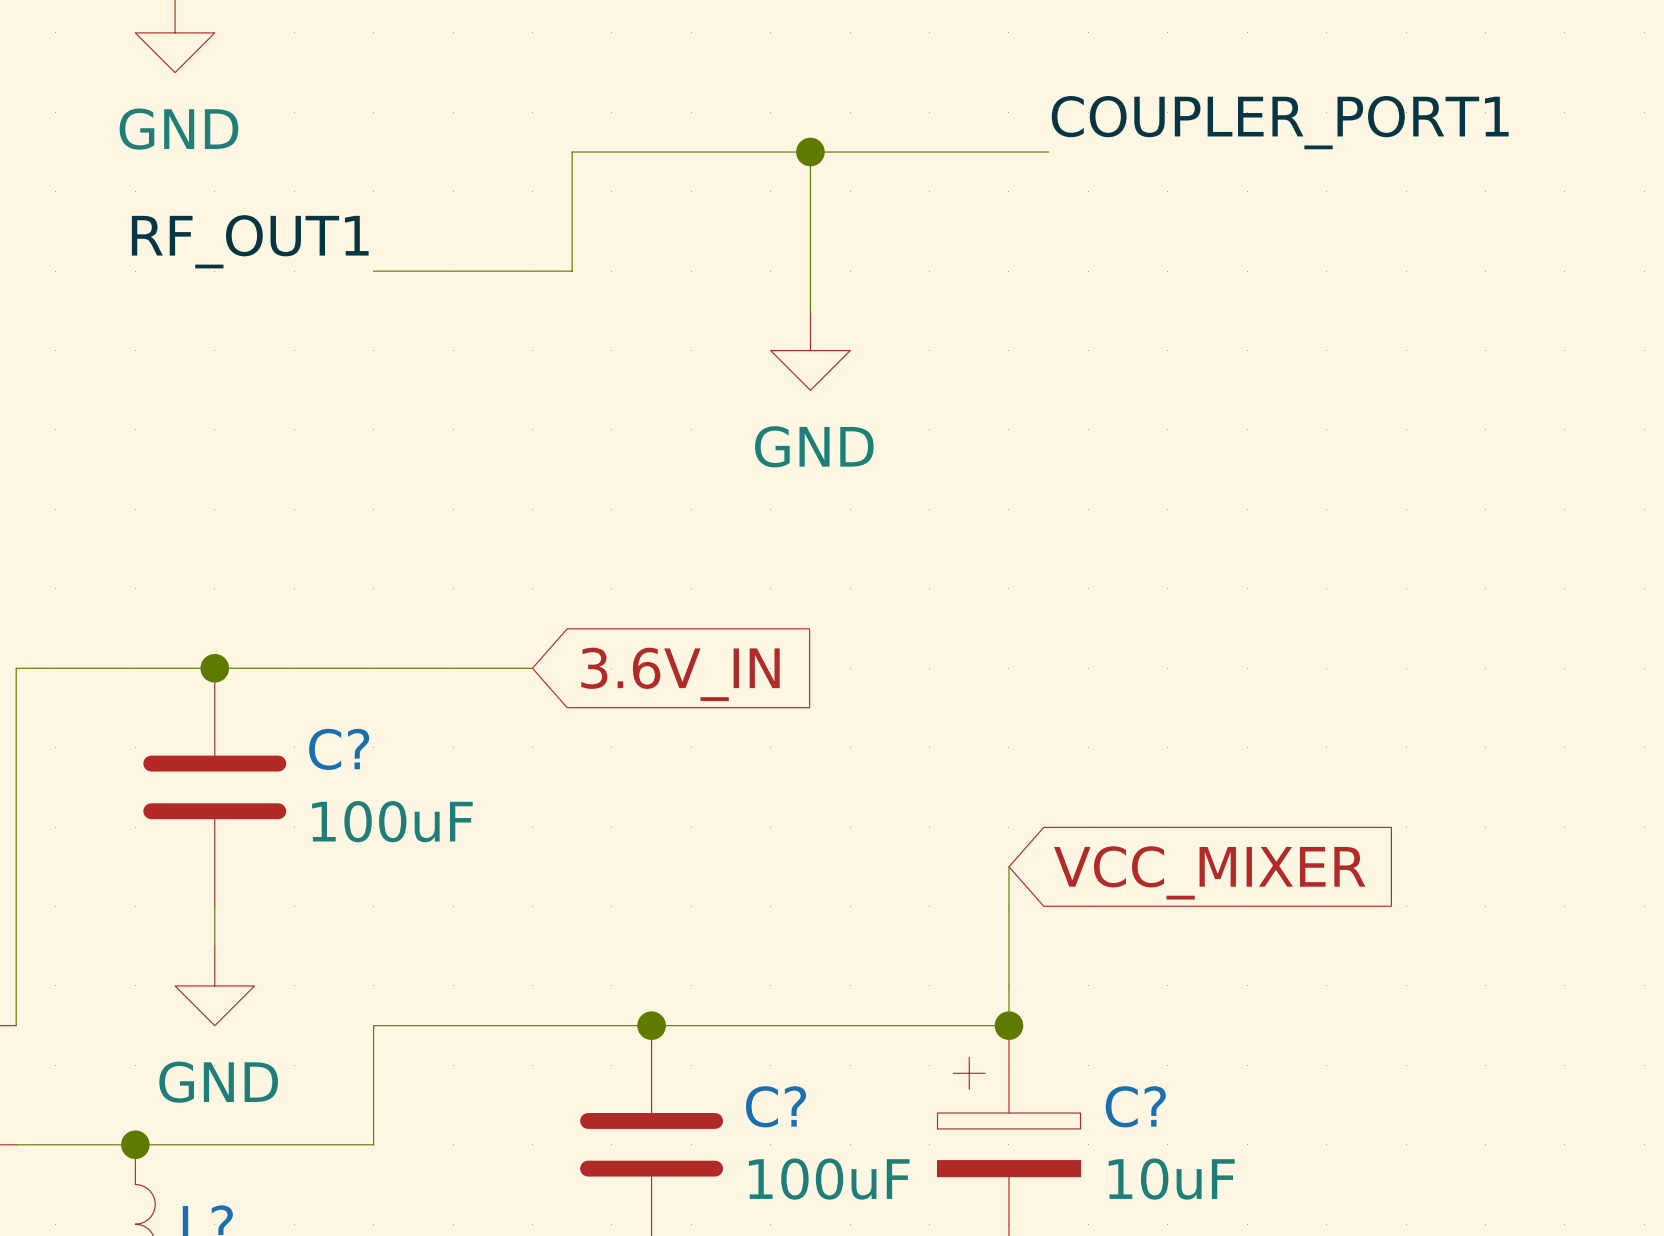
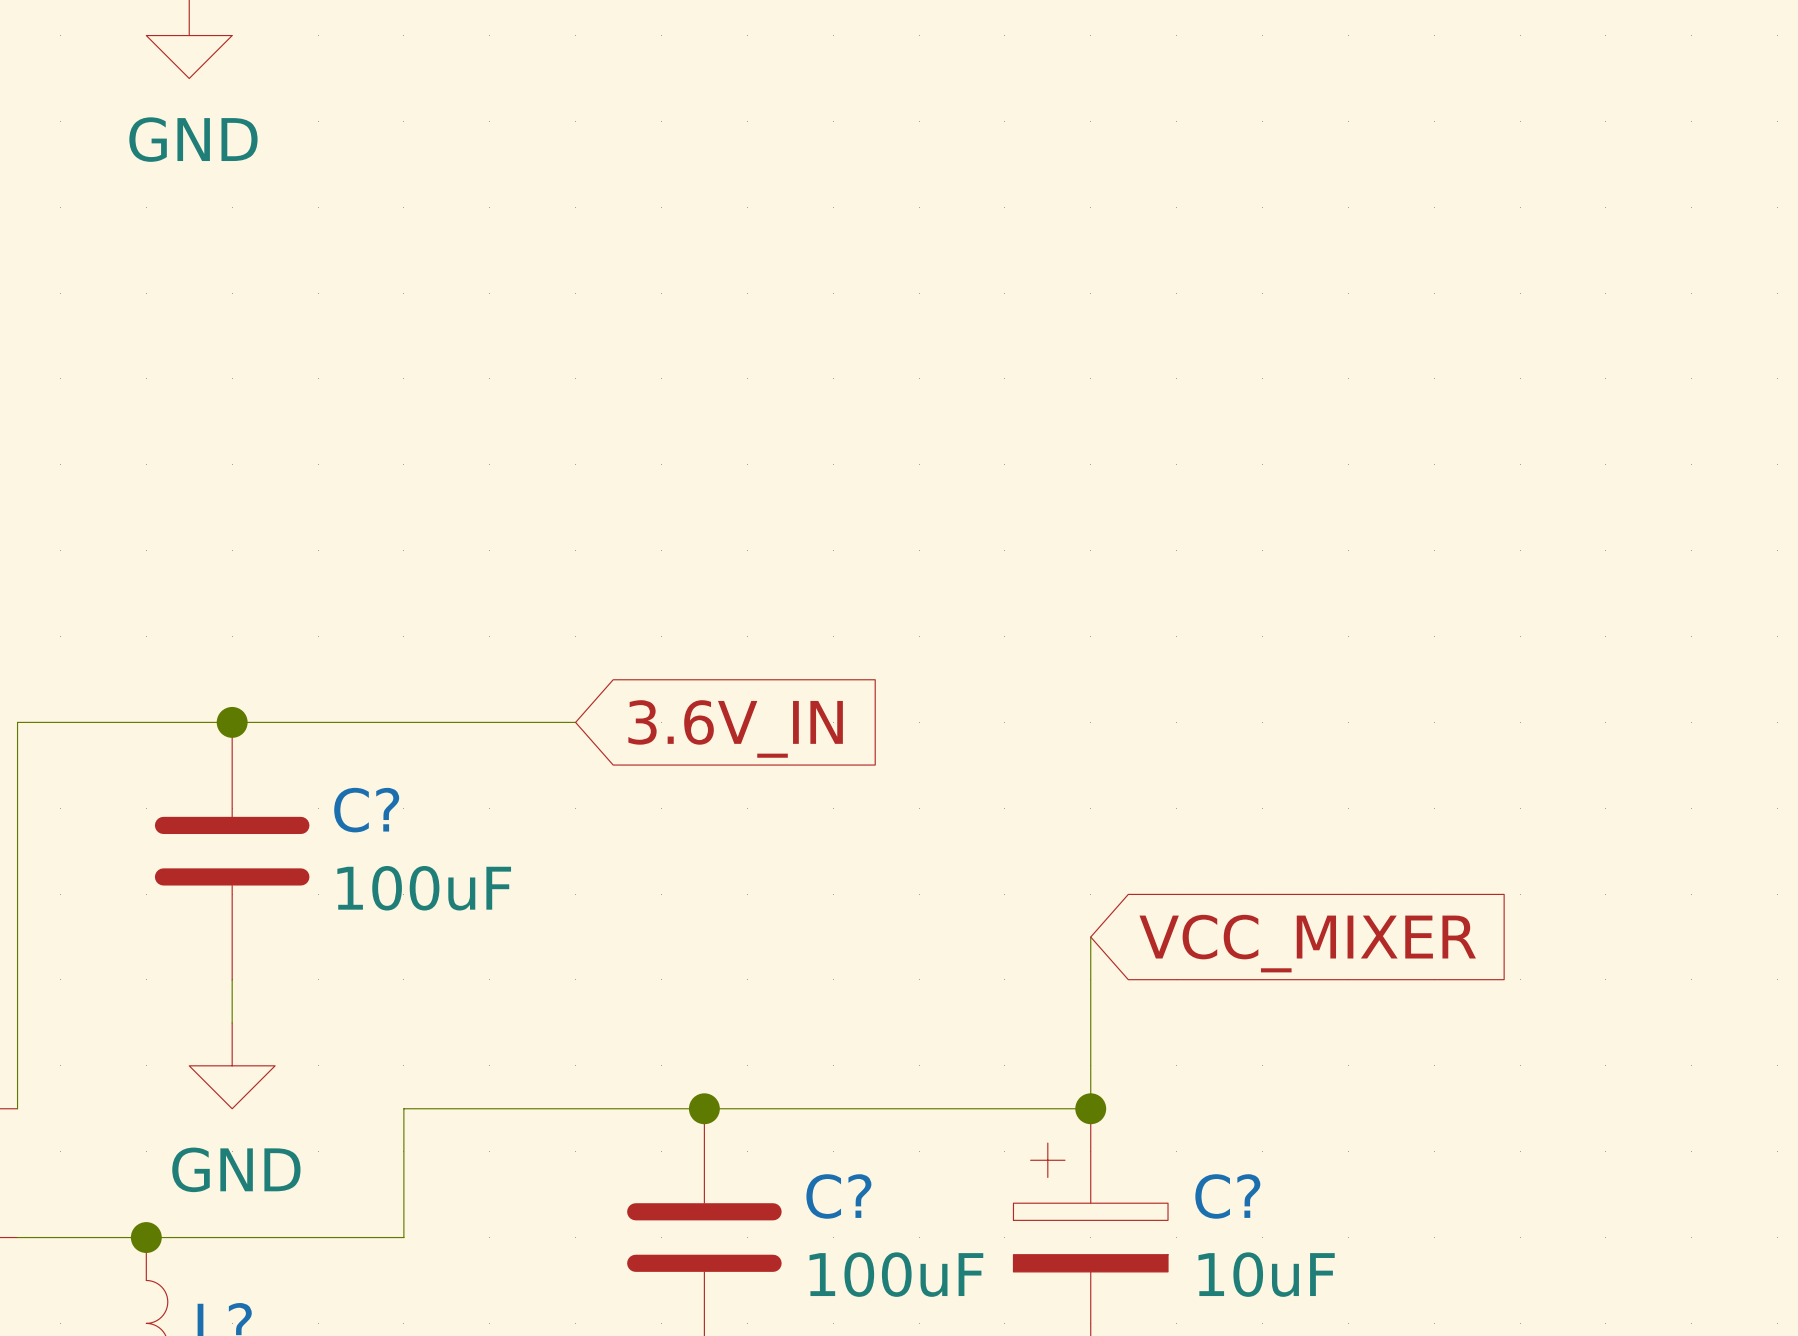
label: COUPLER_PORT1 (1280, 122) -> none
wire: (810, 152) (810, 310) -> none
junction: (810, 152) -> none
wire: (1048, 152) (572, 152) (572, 271) (373, 271) -> none
label: RF_OUT1 (250, 241) -> none
power symbol: GND (810, 350) -> none

